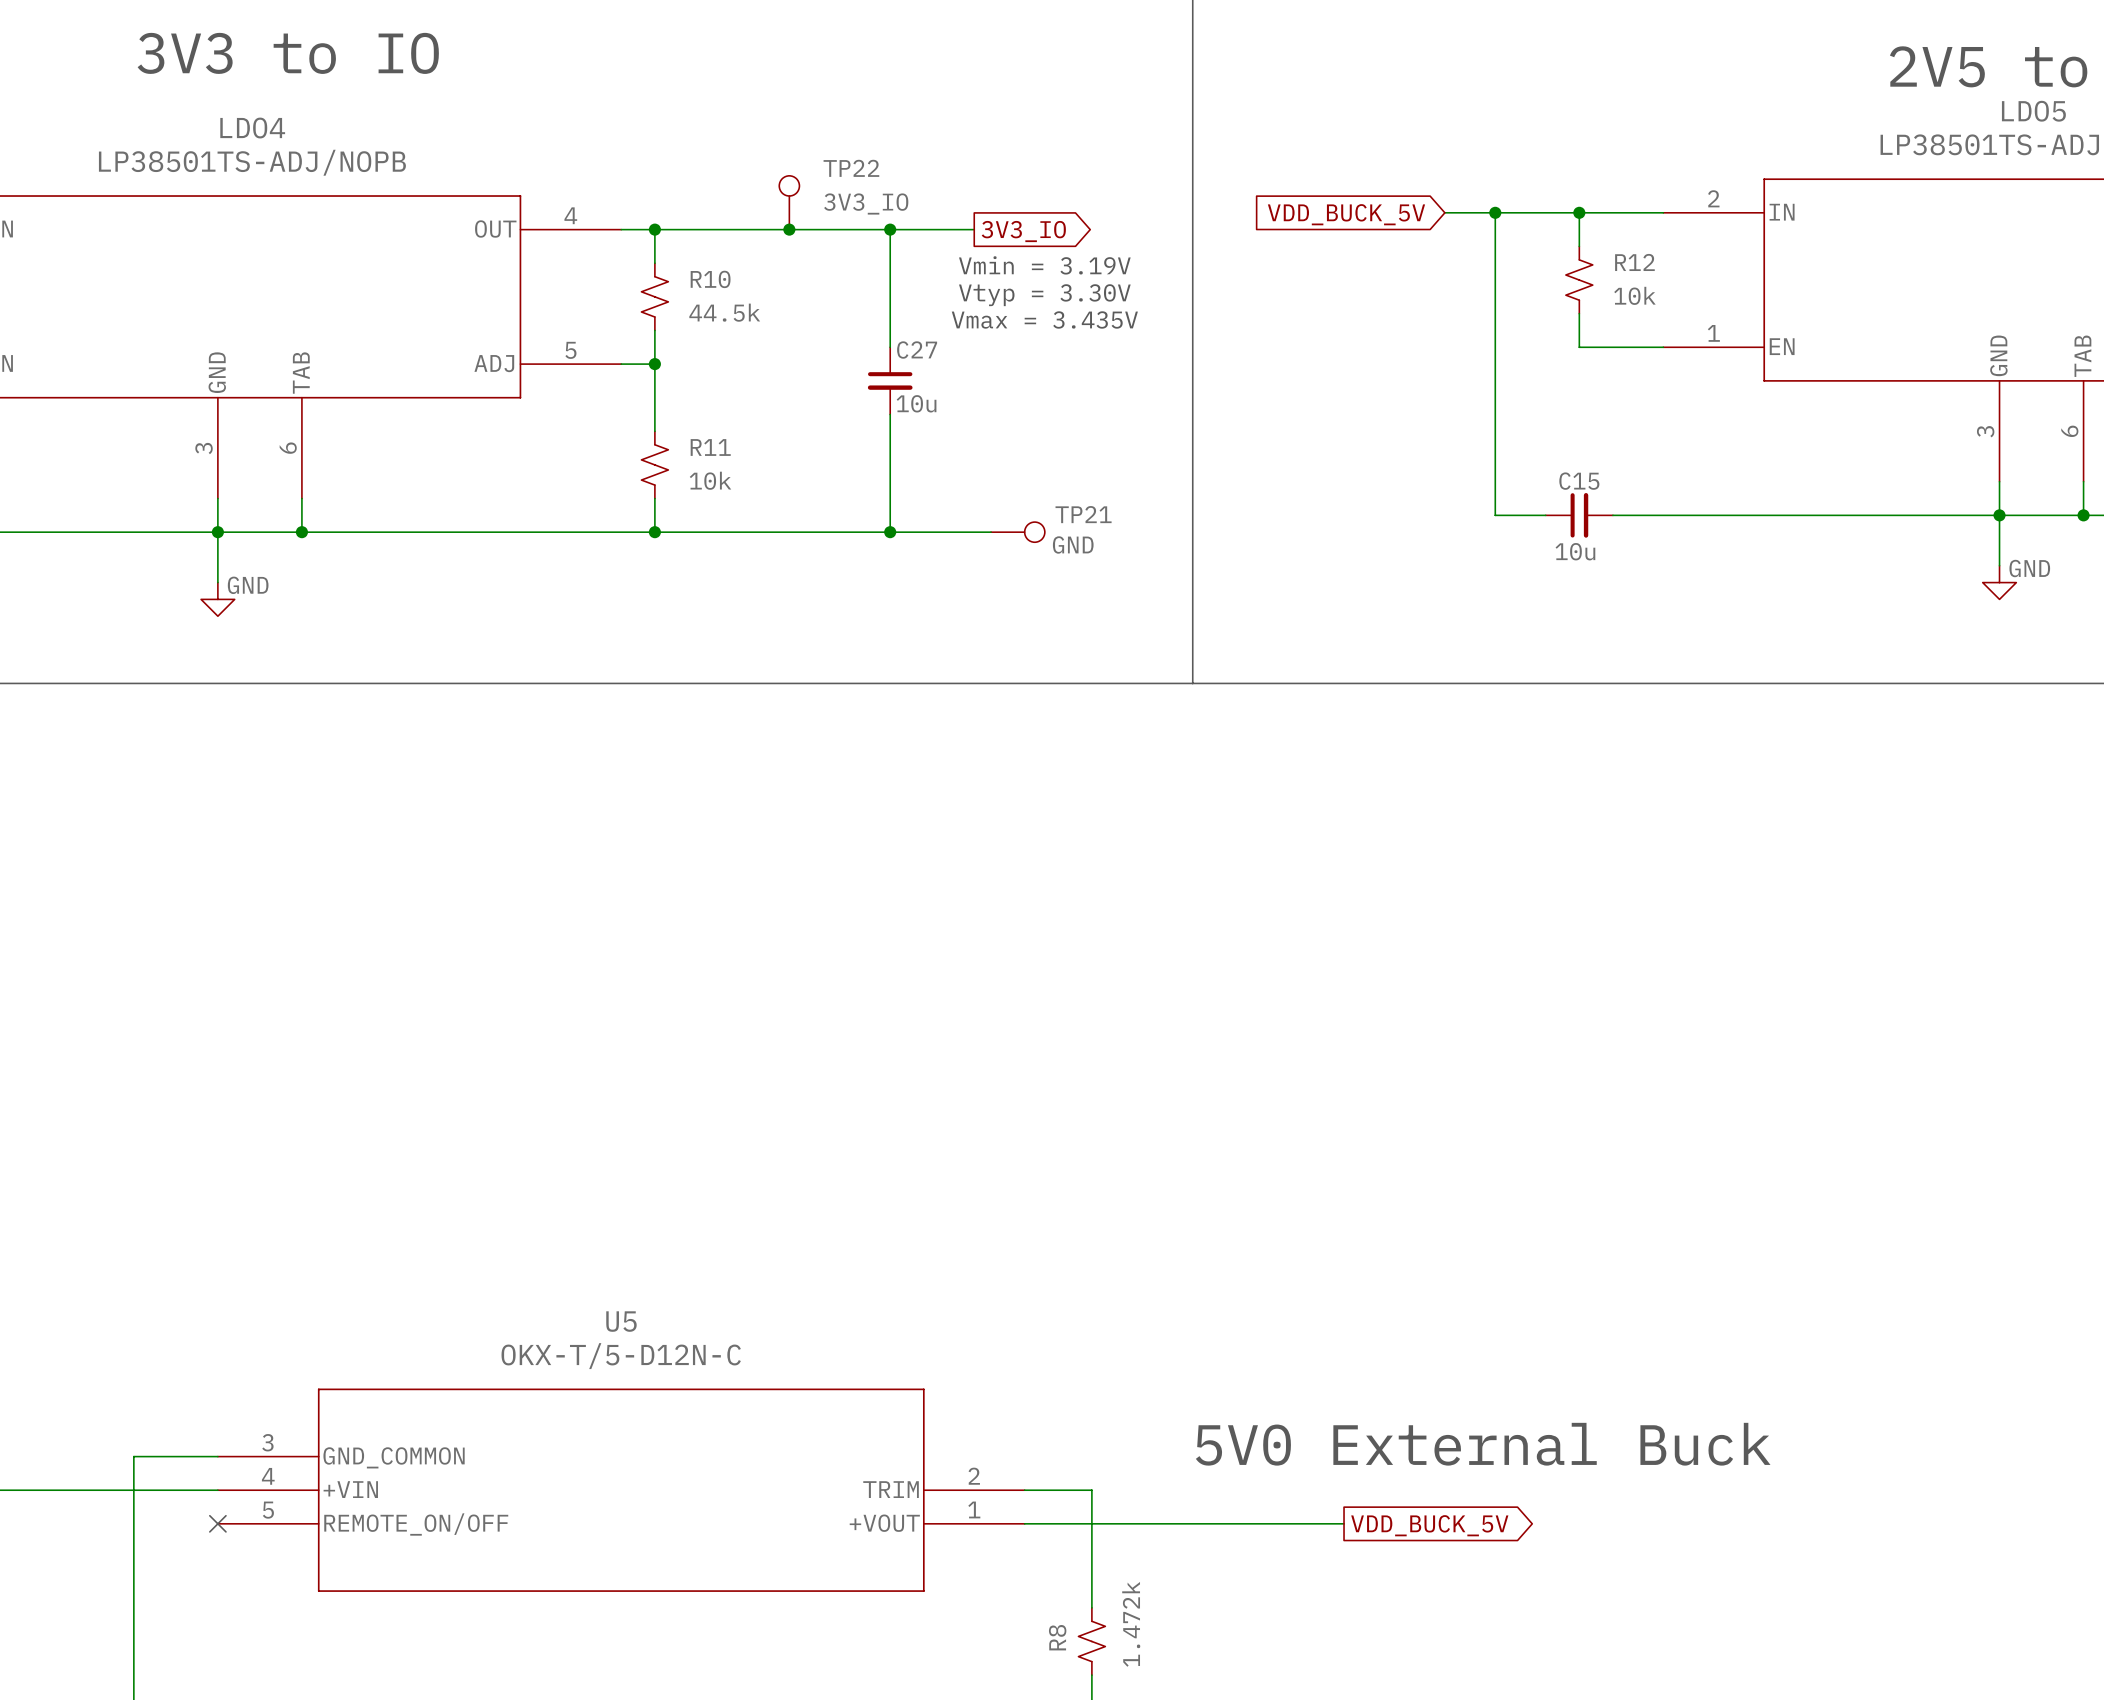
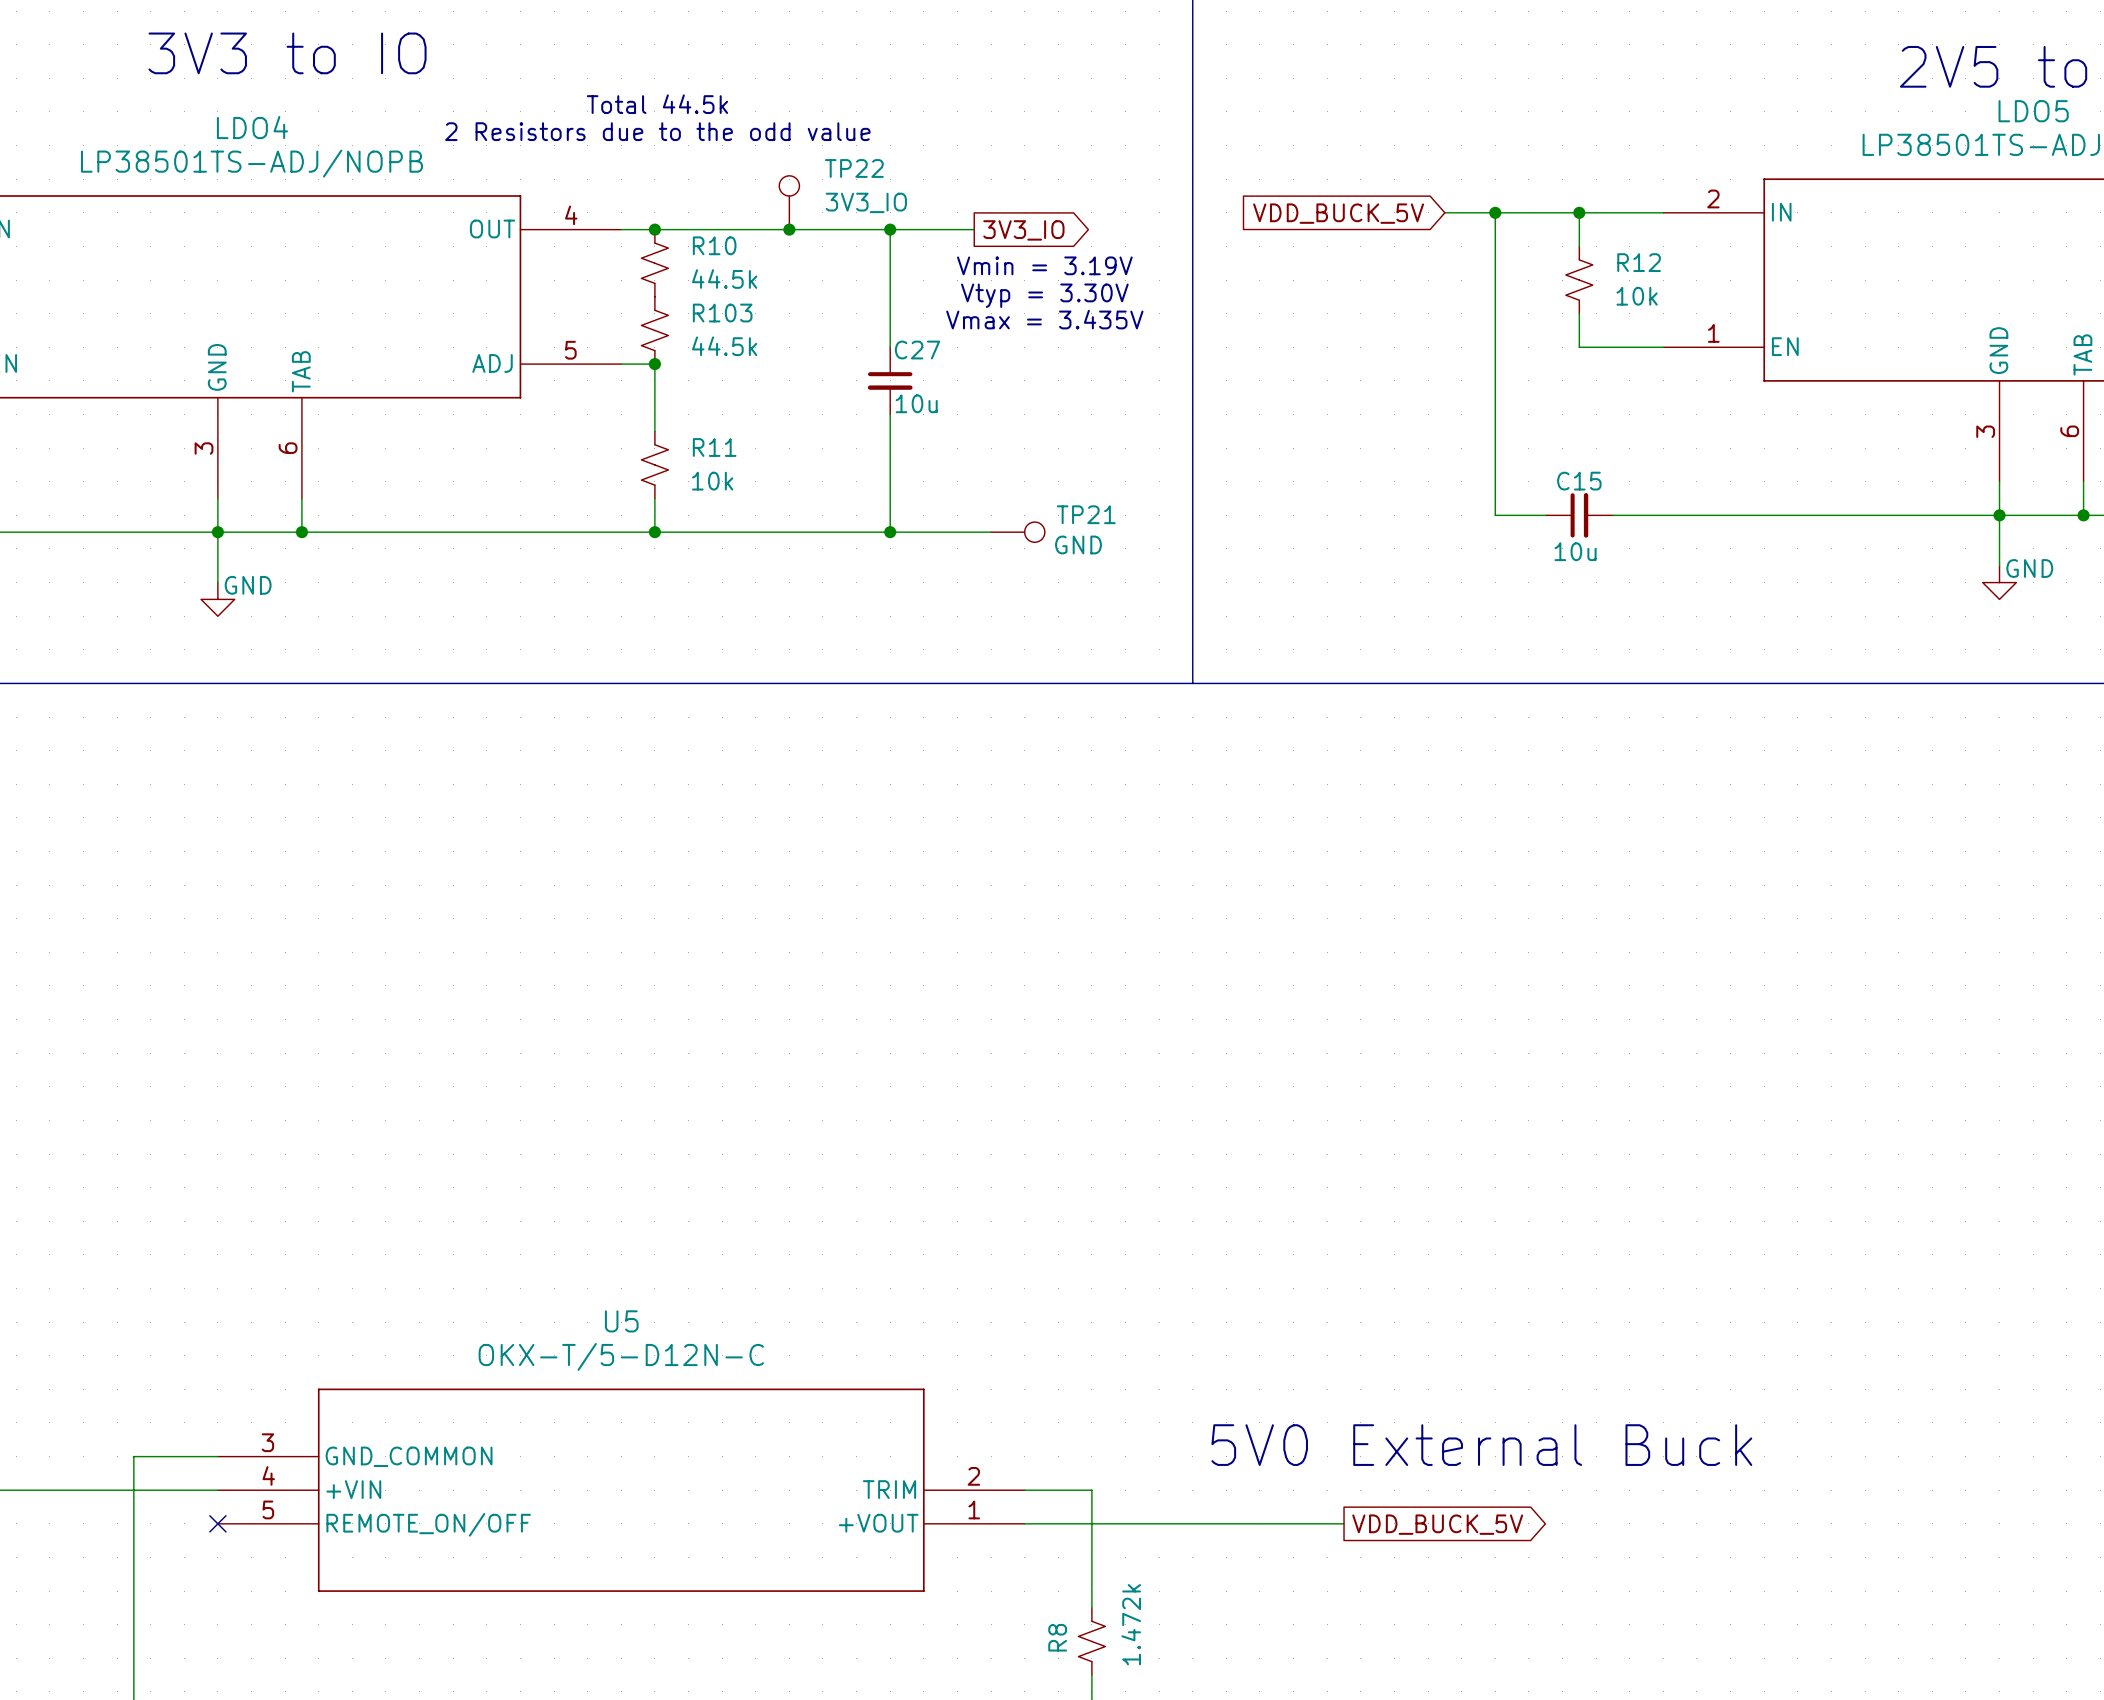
text: none -> Total 44.5k (657, 104)
text: none -> 2 Resistors due to the odd value (657, 131)
R10 position: (654, 296) -> (654, 263)
wire: (654, 330) (654, 364) -> none
R103: none -> 44.5k (654, 330)

